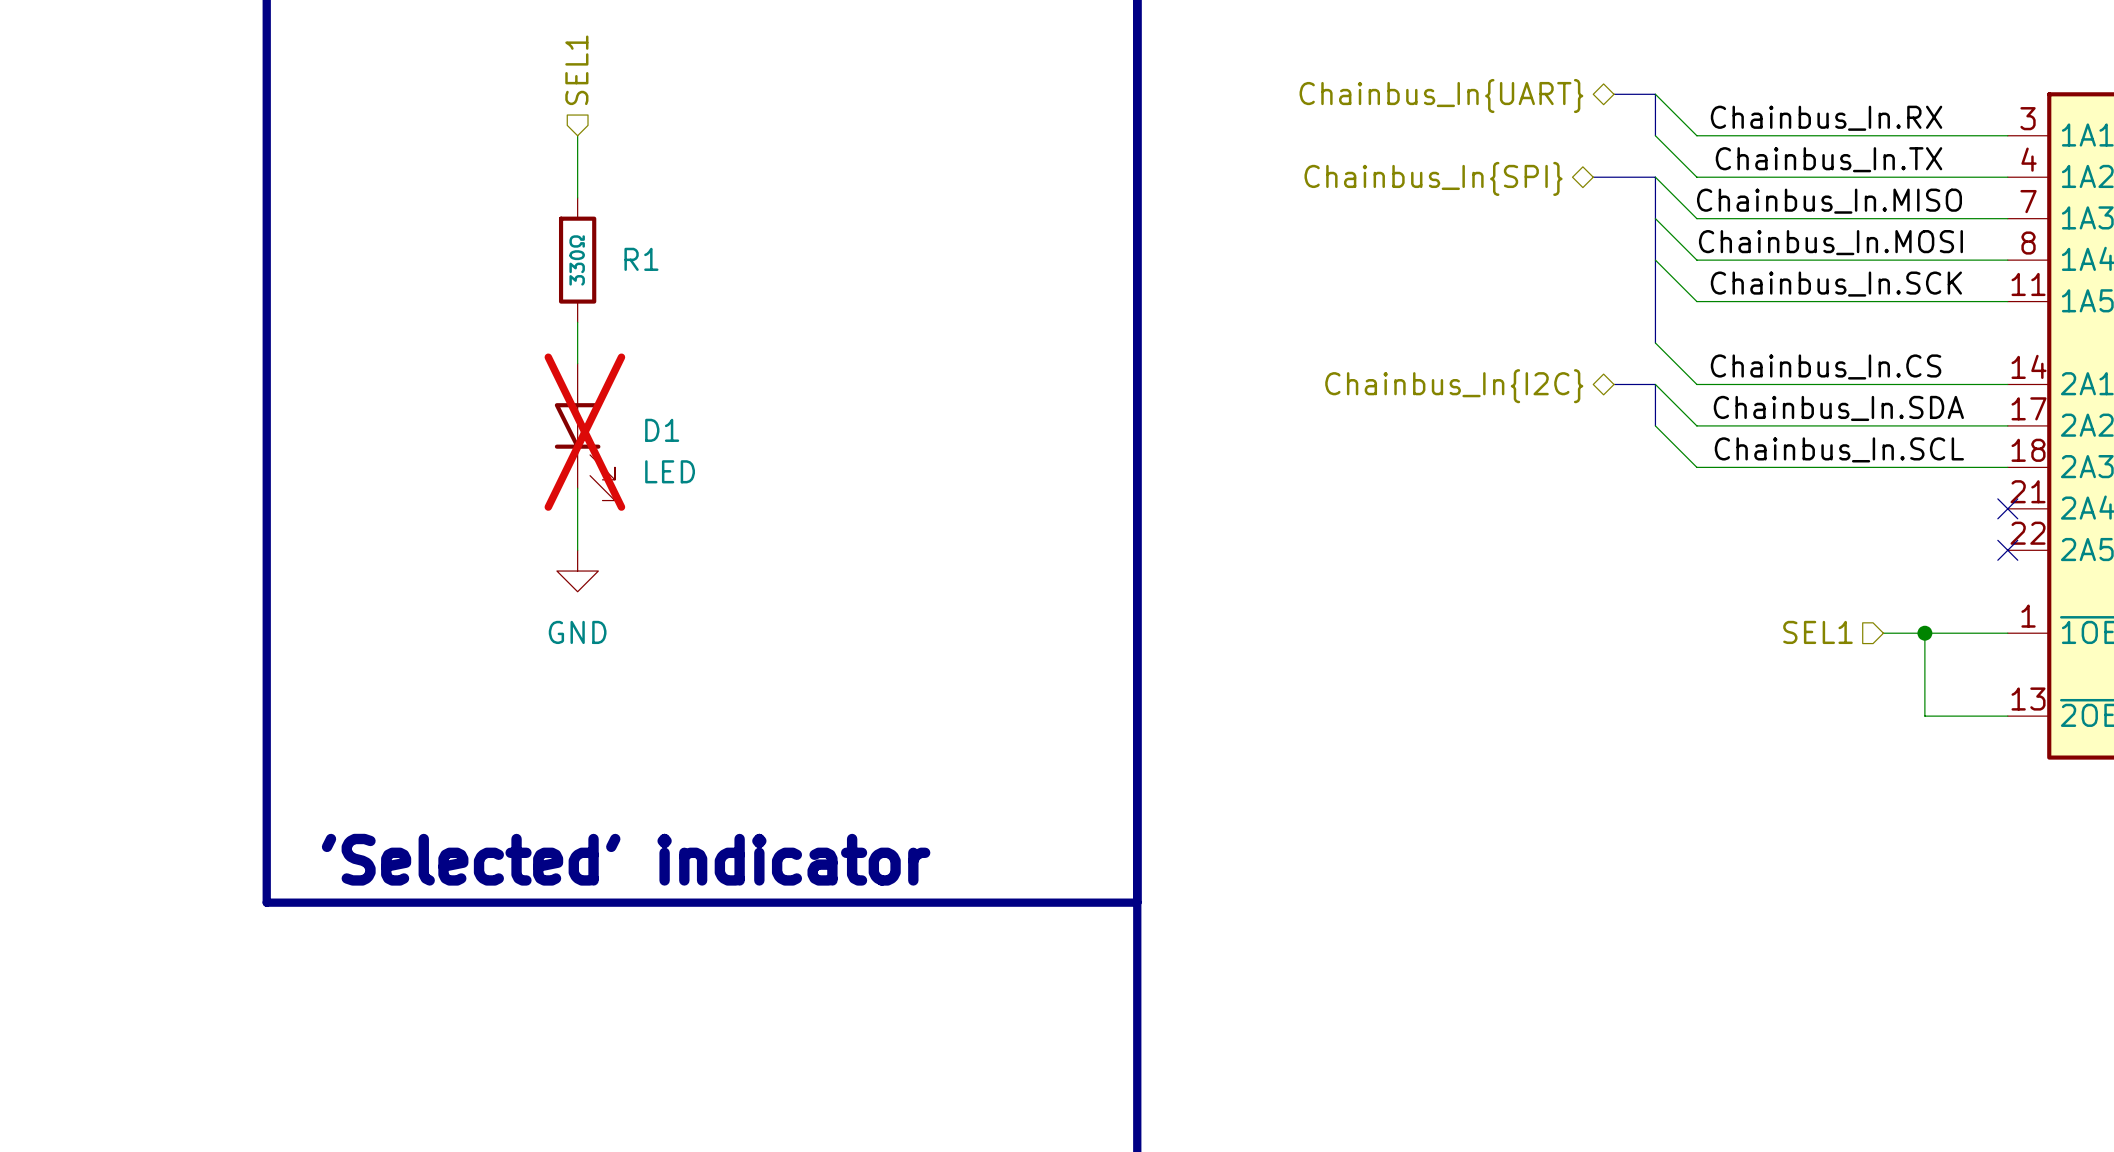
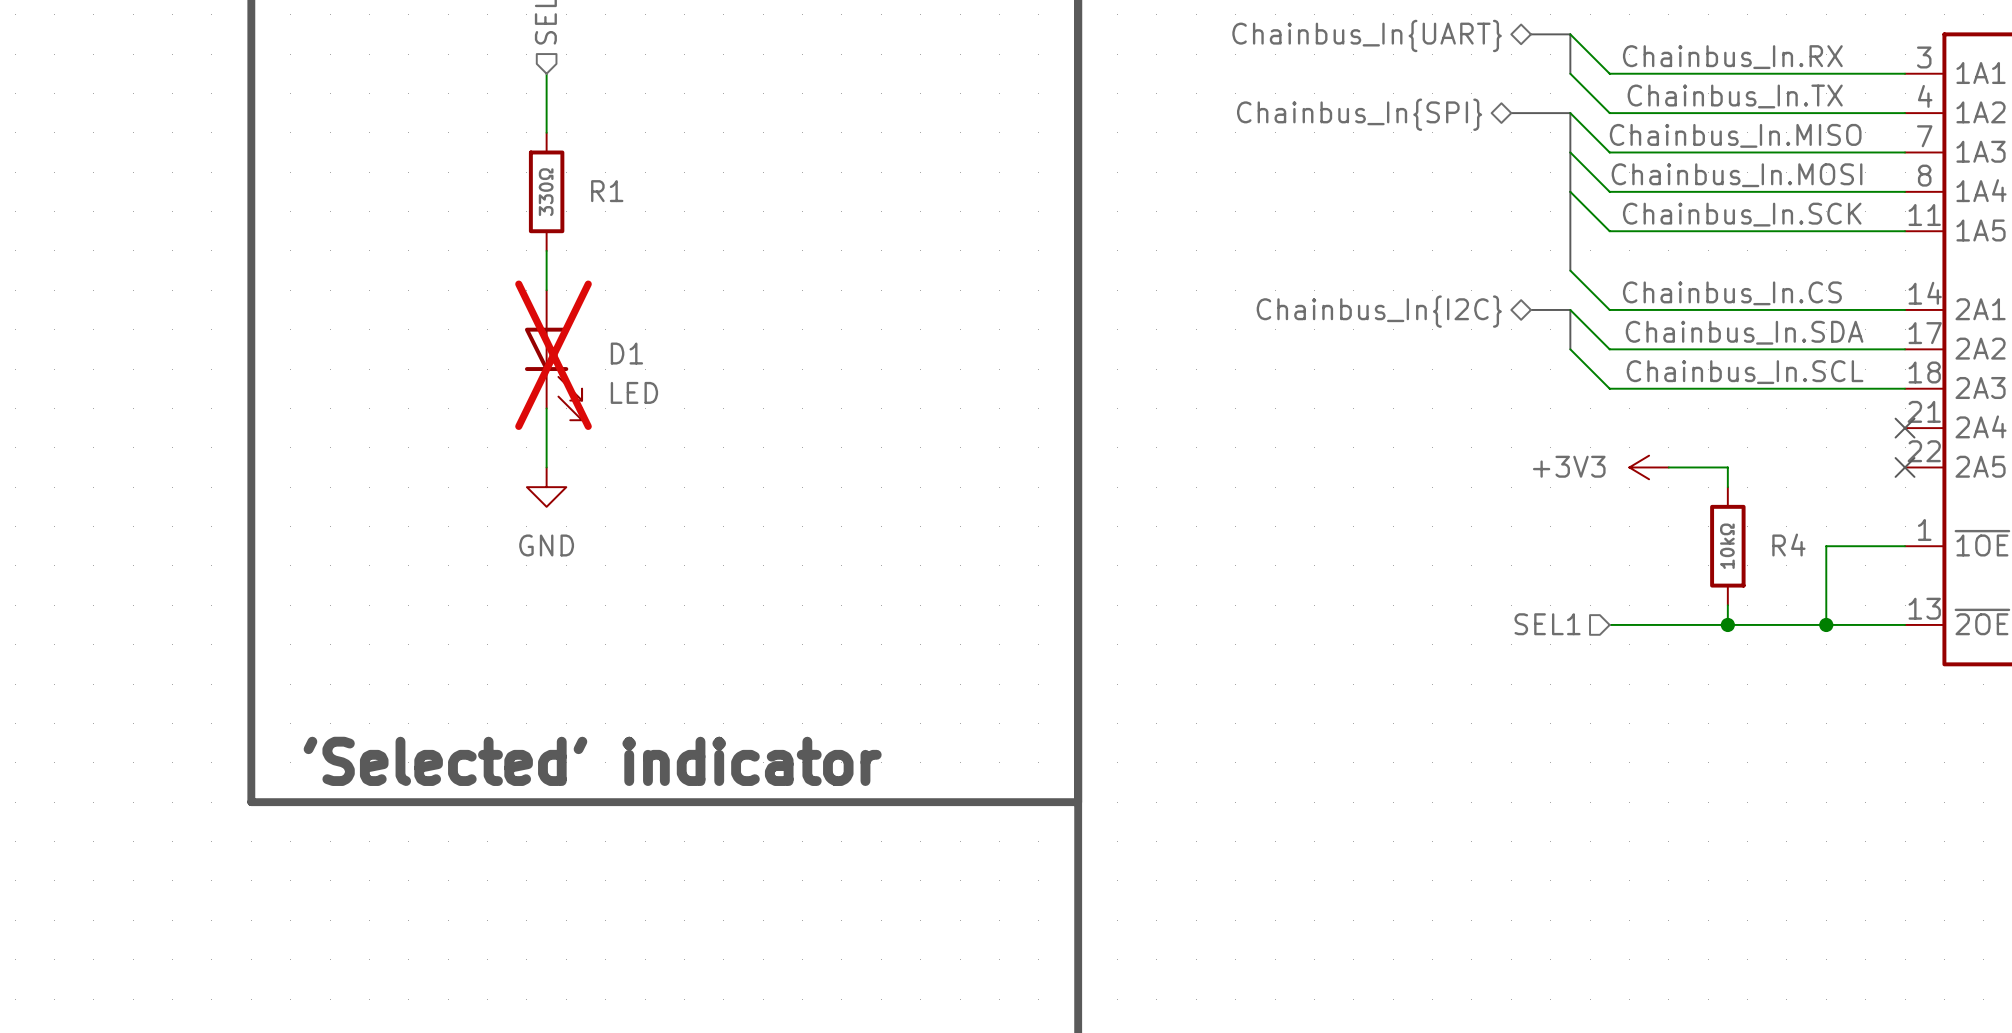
power symbol: none -> +3V3 (1649, 467)
wire: none -> (1668, 467) (1727, 467) (1727, 487)
hierarchical label position: SEL1 (1817, 632) -> SEL1 (1547, 624)
R4: none -> 10kΩ (1727, 546)
wire: (1883, 633) (1924, 633) -> none
junction: (1924, 633) -> none
wire: none -> (1727, 605) (1727, 624)
wire: none -> (1609, 624) (1826, 624)
junction: none -> (1727, 624)
junction: none -> (1826, 624)

